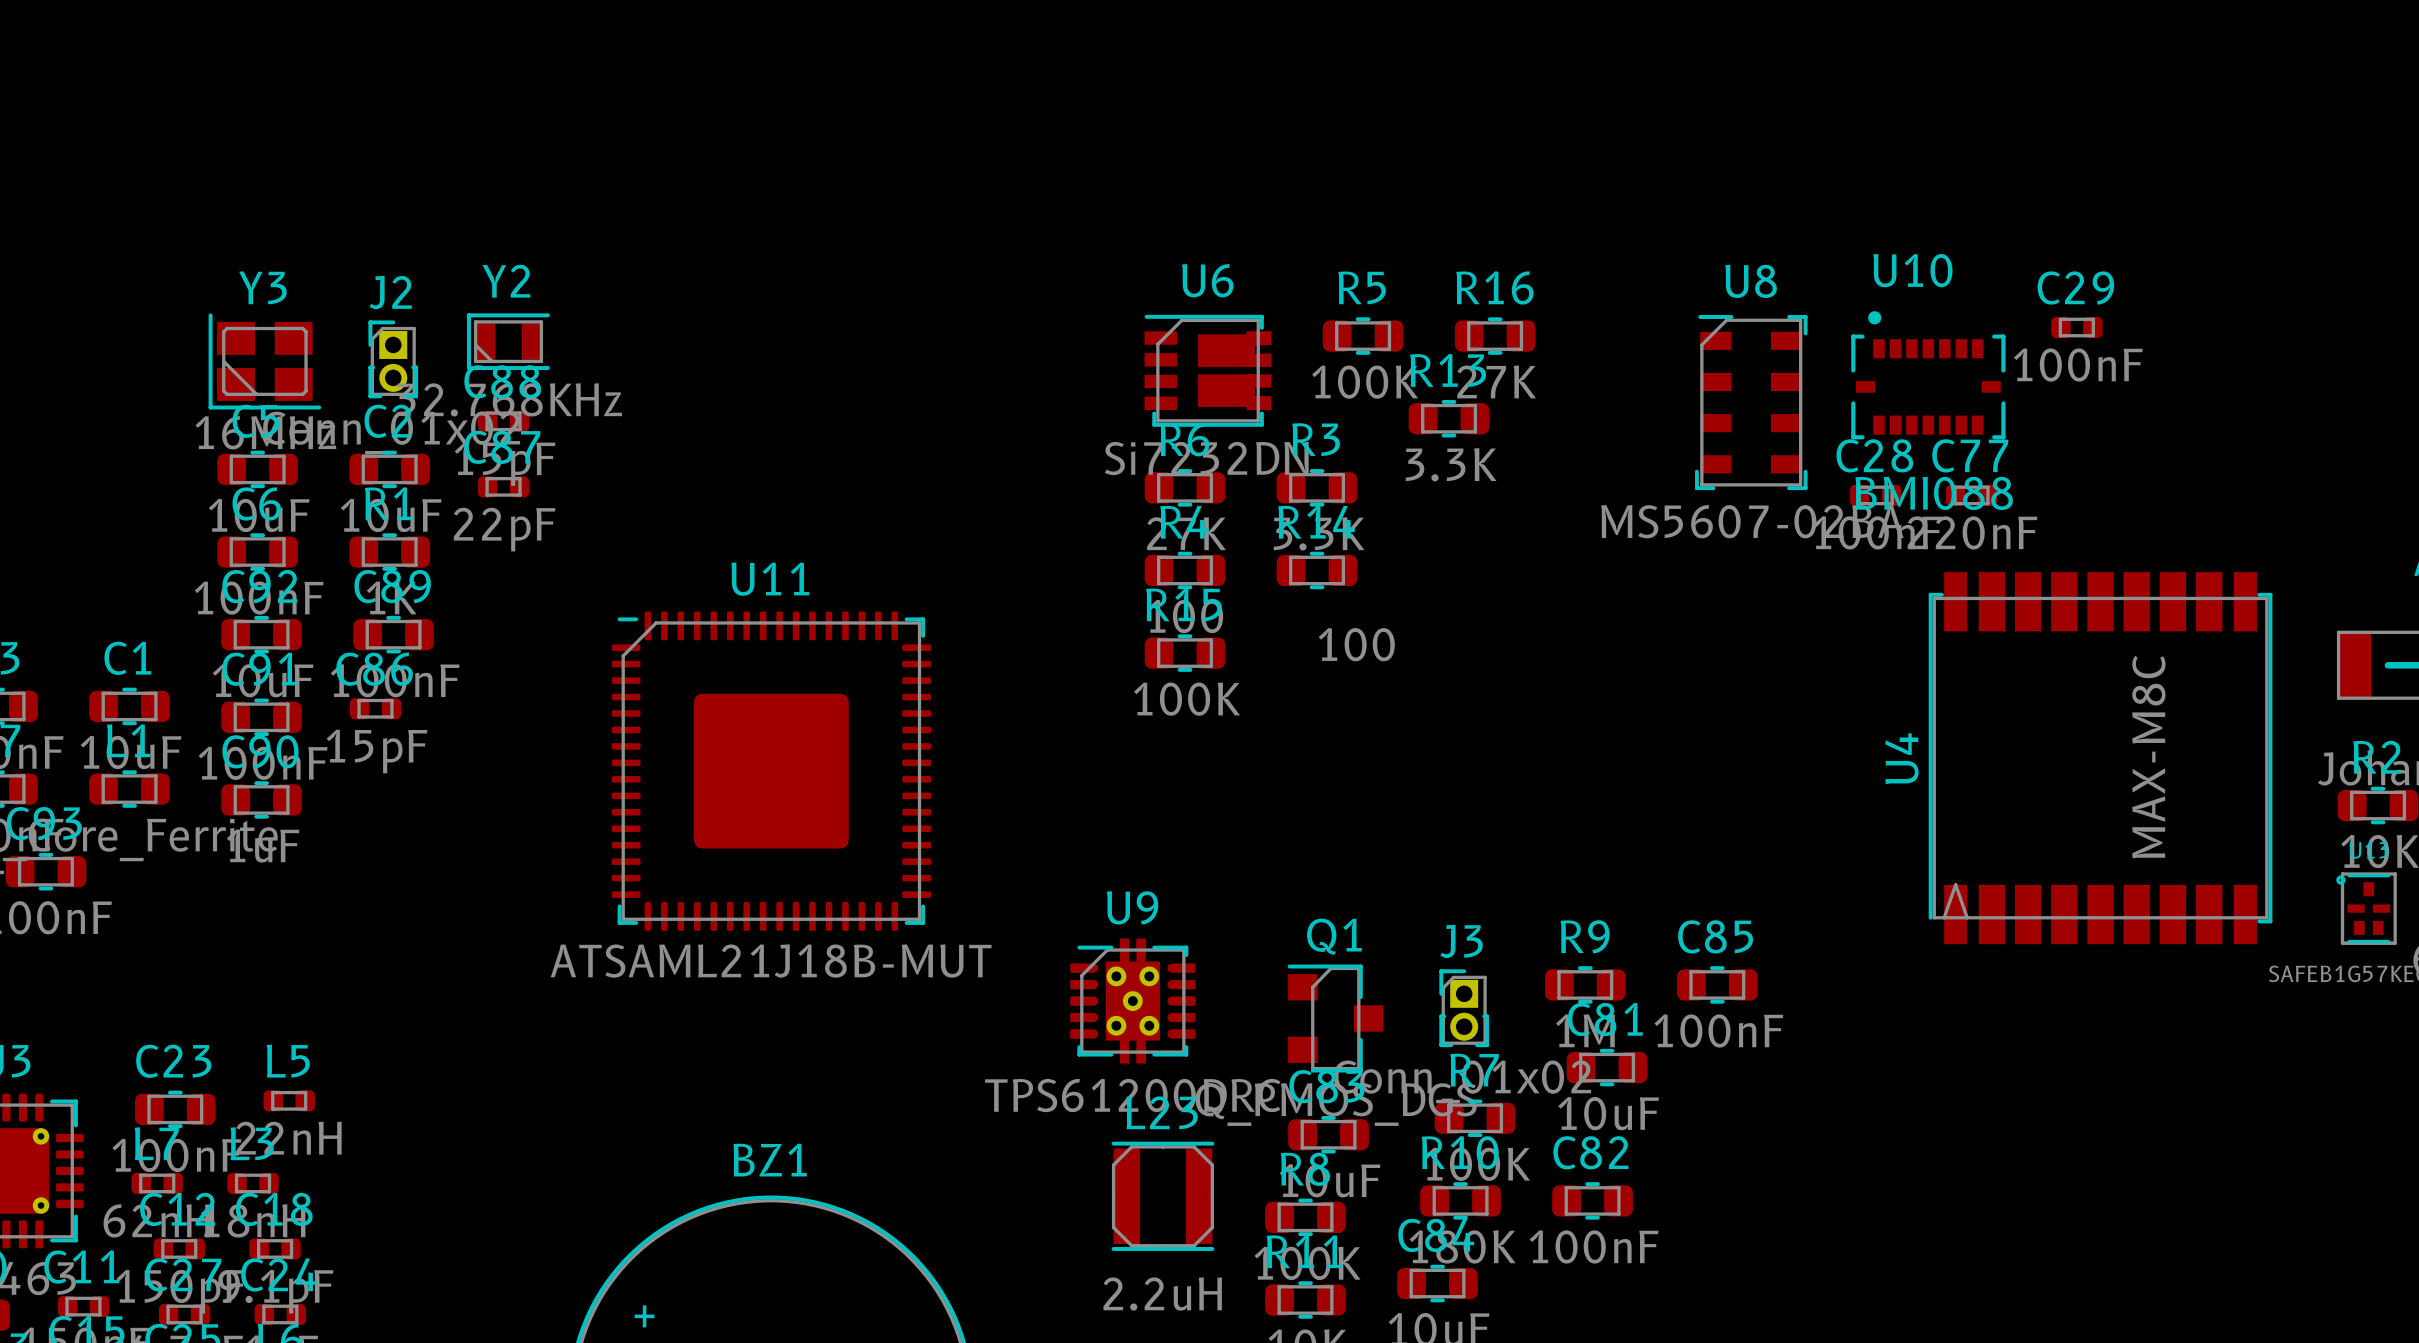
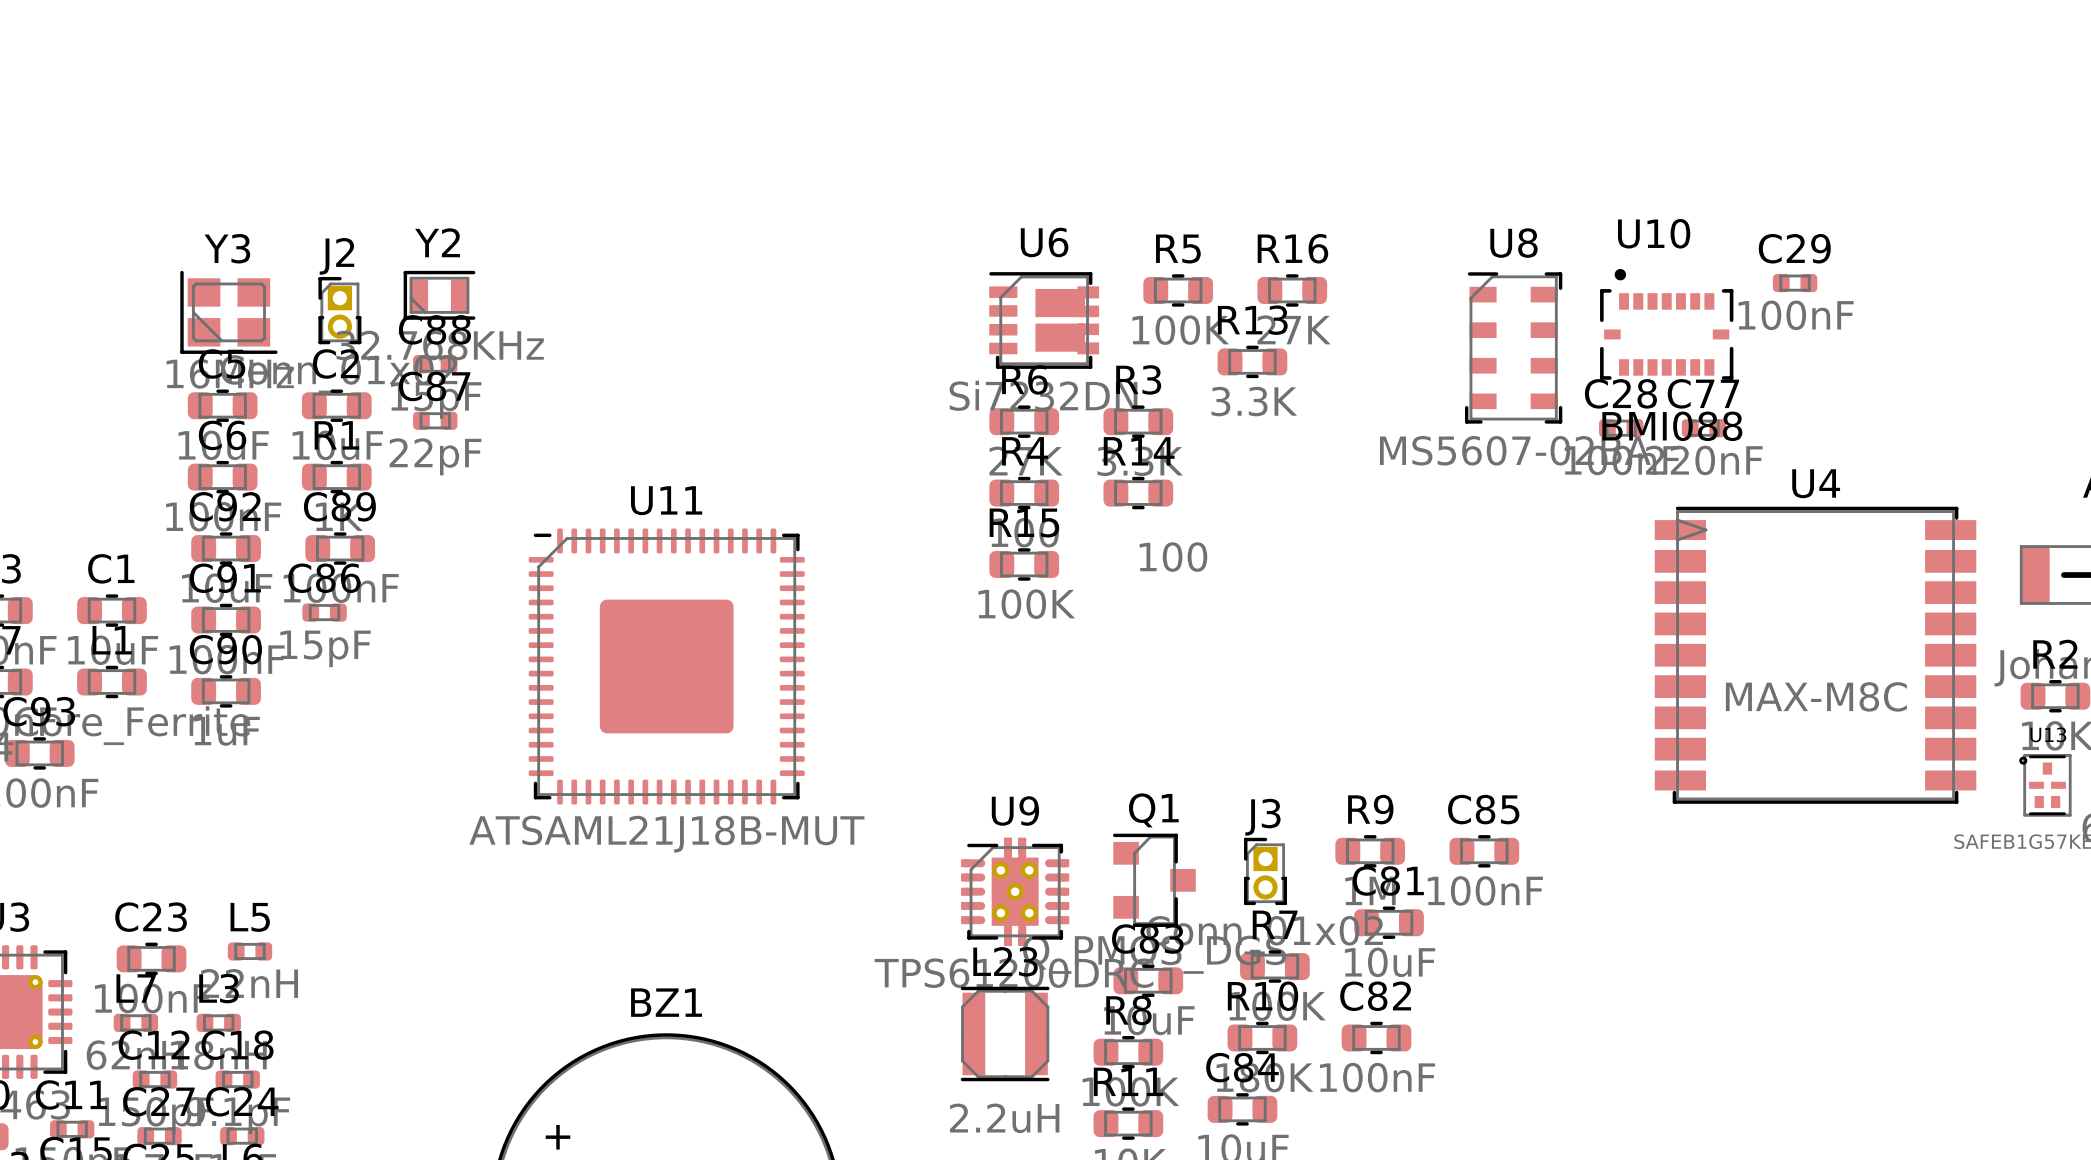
U4 rotation: 0° (2100, 758) -> 90° clockwise (1815, 655)
U9 position: (1132, 1001) -> (1015, 891)

